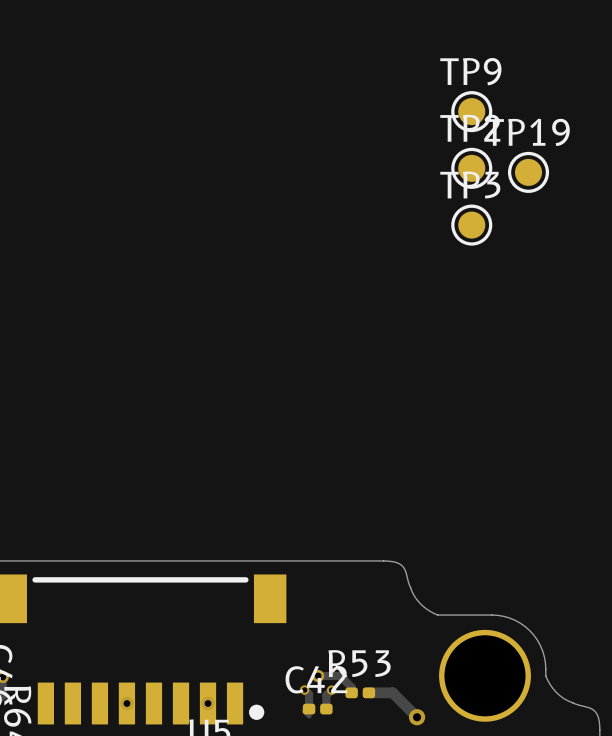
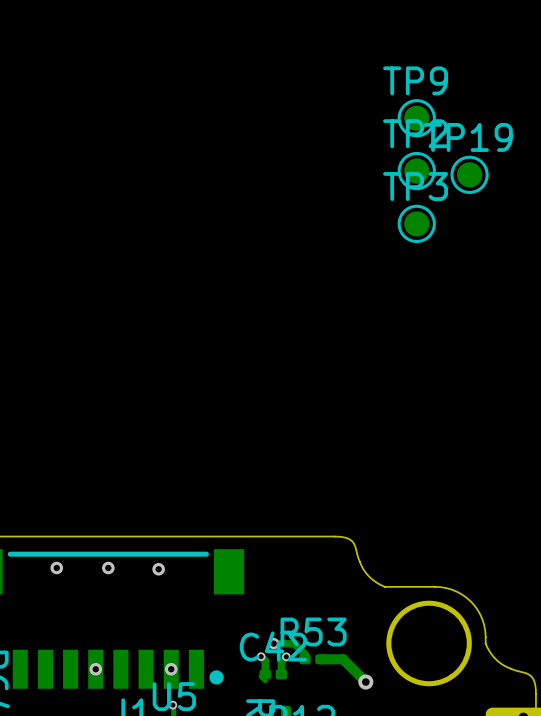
via: none -> (56, 568)
via: none -> (108, 568)
via: none -> (158, 569)

